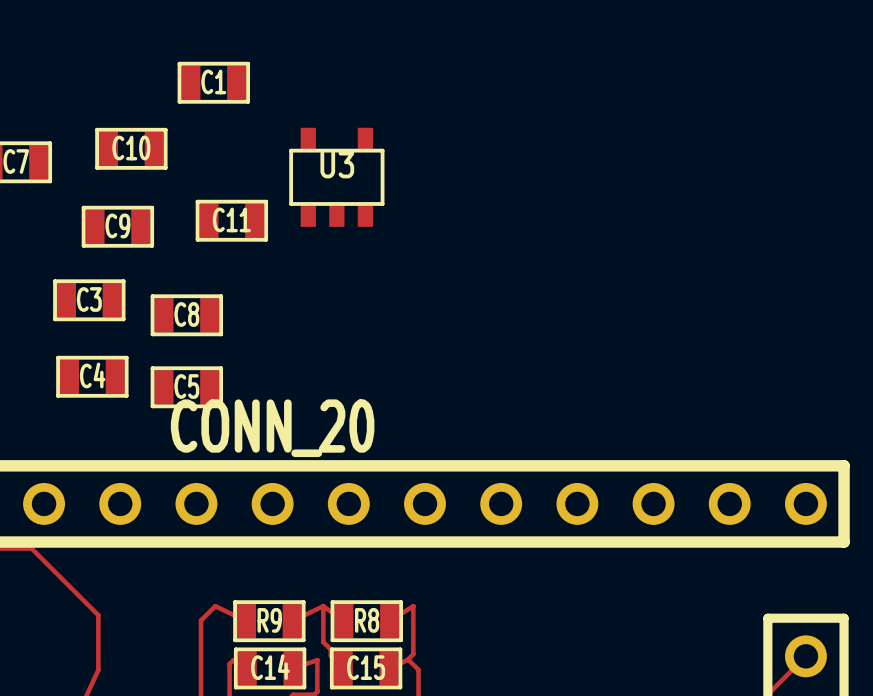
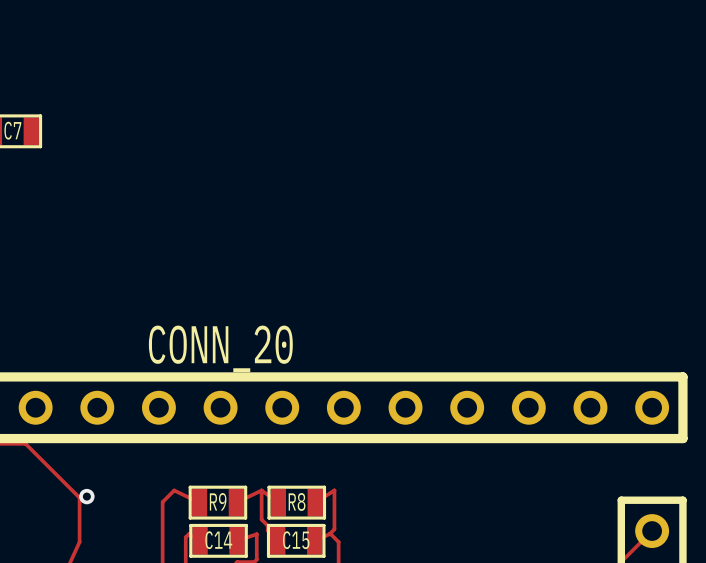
C1: (213, 82) -> none
C10: (131, 148) -> none
U3: (336, 177) -> none
C11: (231, 220) -> none
C9: (117, 226) -> none
C3: (89, 300) -> none
C8: (186, 315) -> none
C4: (92, 376) -> none
C5: (186, 387) -> none
via: none -> (86, 496)

